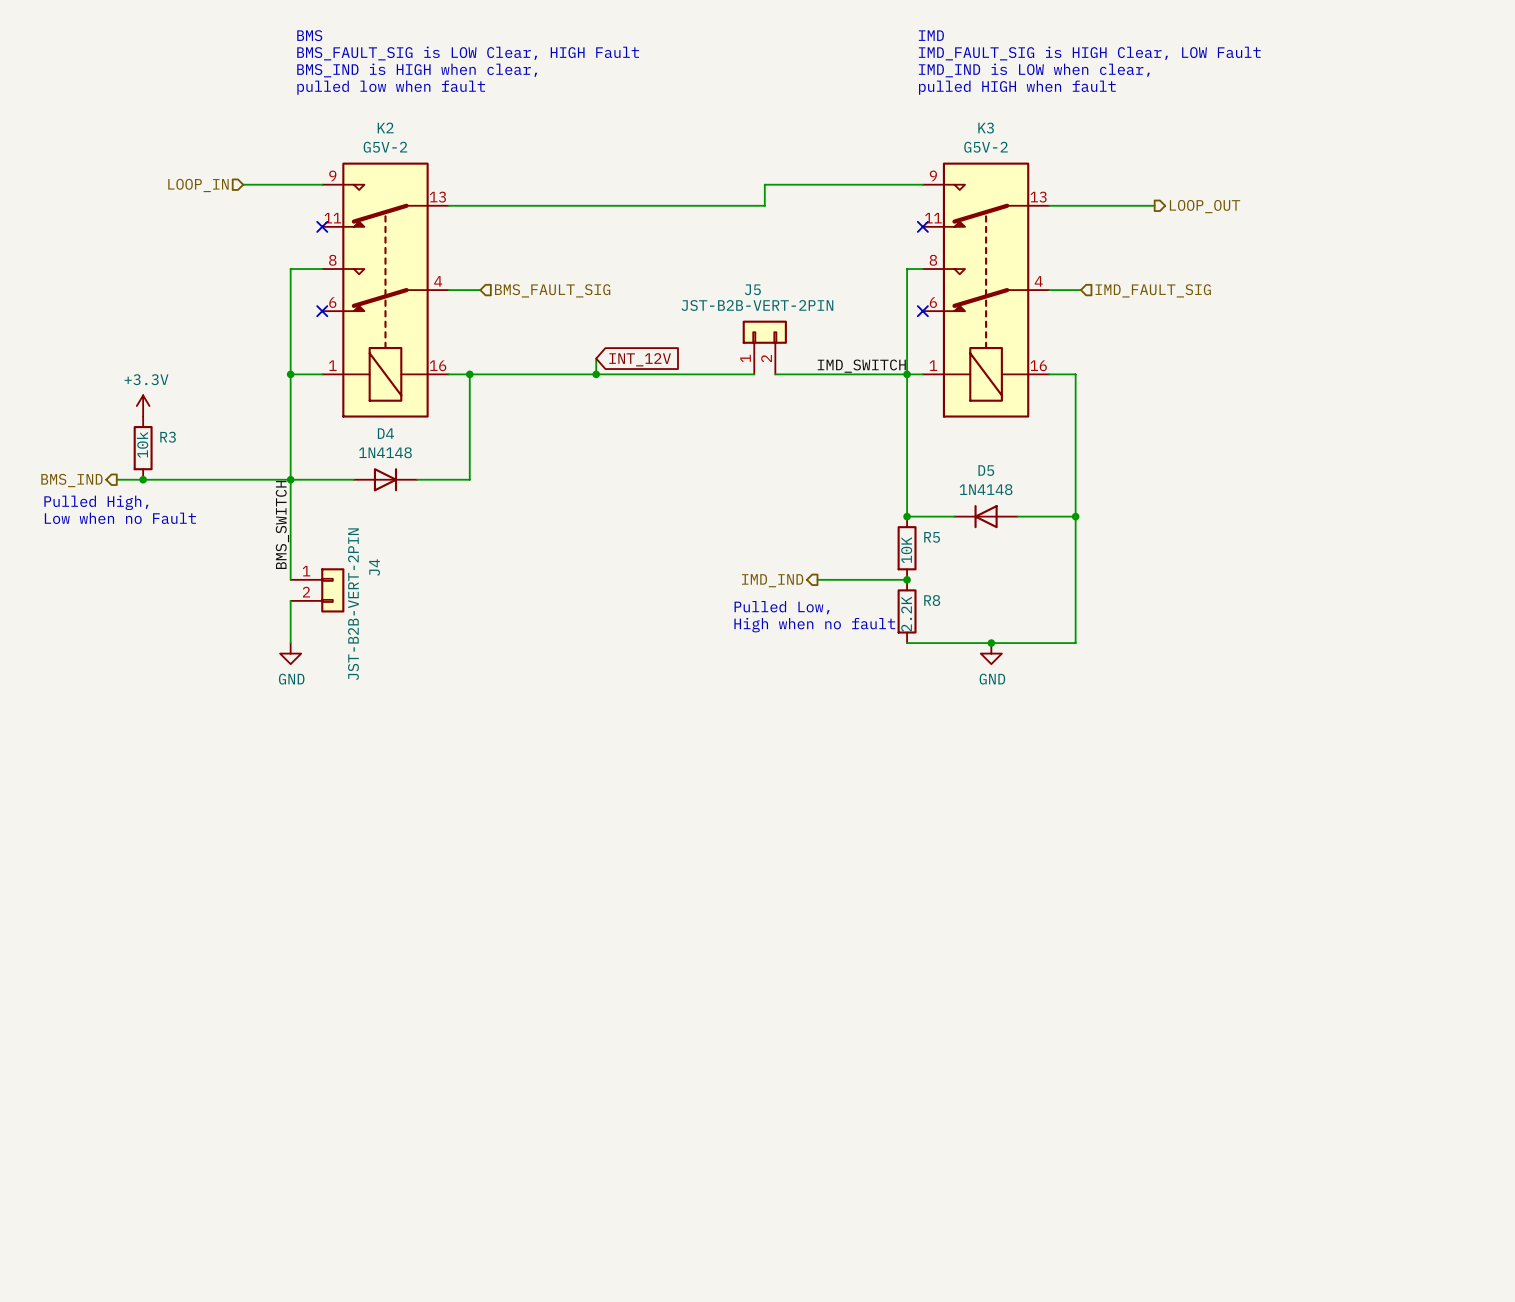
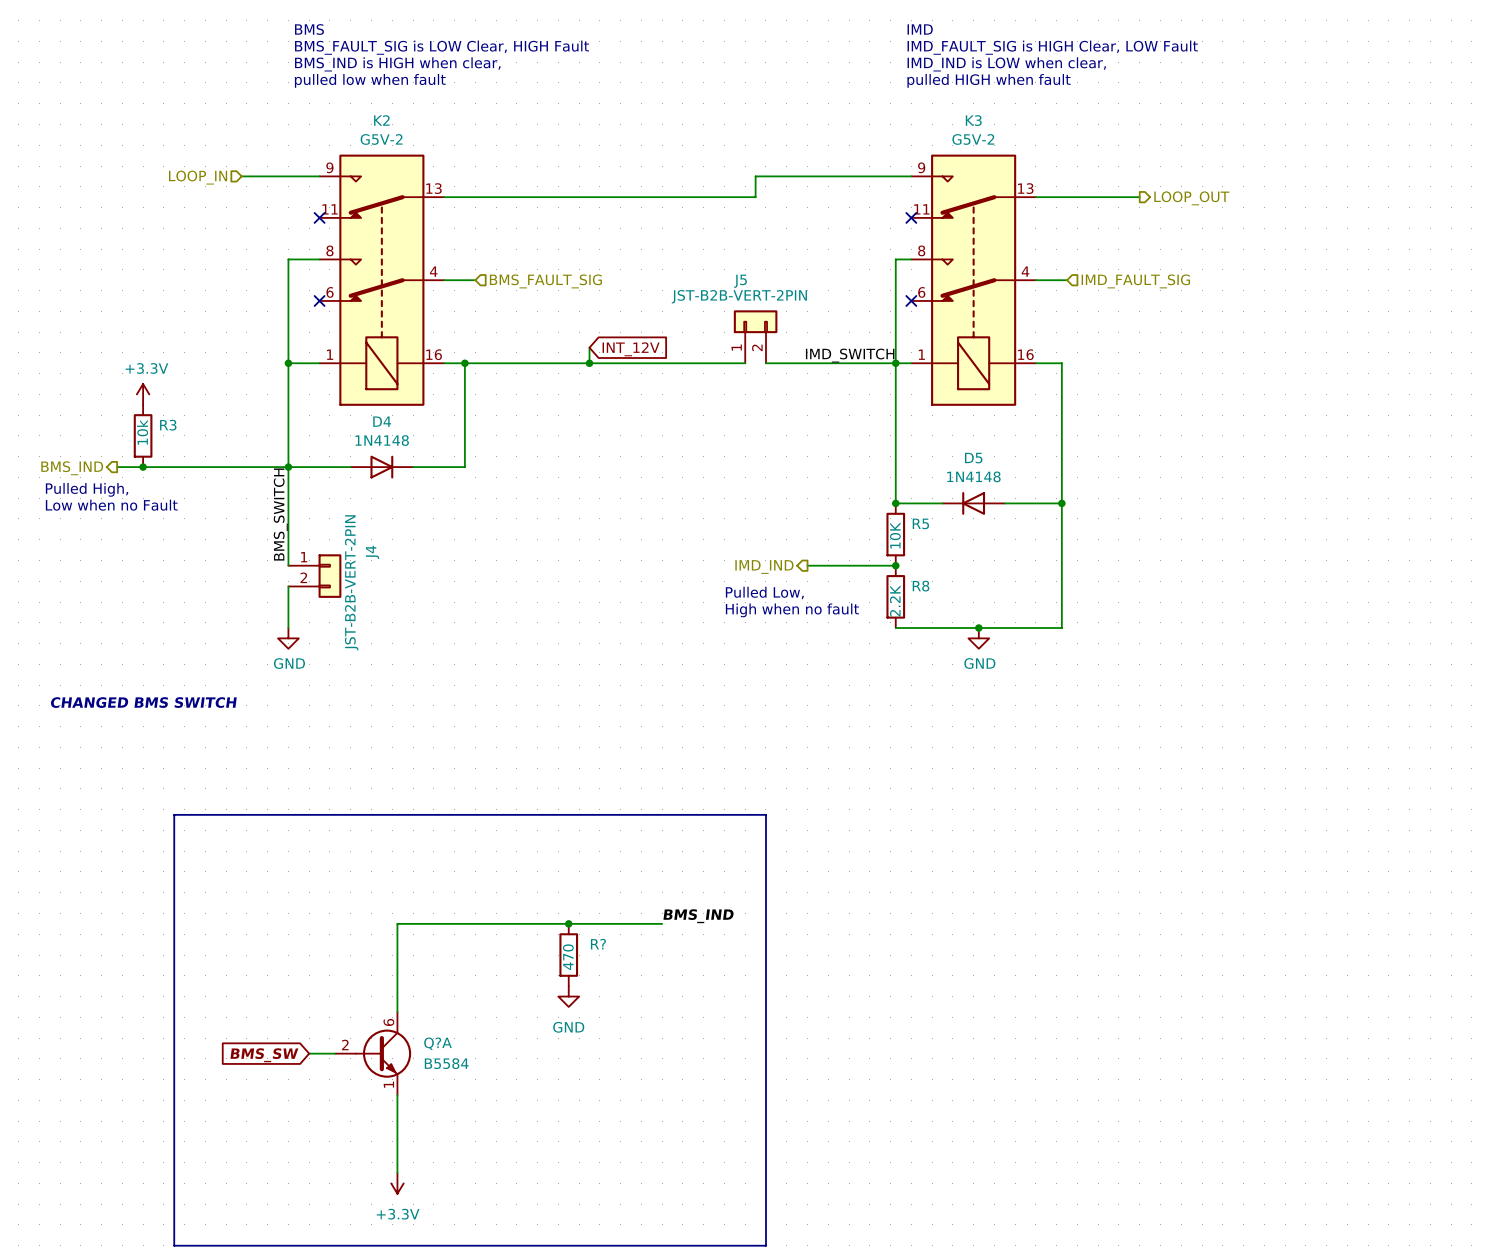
text: none -> CHANGED BMS SWITCH (143, 702)
bus: none -> (174, 814) (174, 1245) (765, 1245) (765, 814) (174, 814)
label: none -> BMS_IND (698, 916)
junction: none -> (568, 923)
wire: none -> (662, 923) (397, 923) (397, 1012)
R?: none -> 470 (568, 955)
power symbol: none -> GND (568, 996)
wire: none -> (309, 1053) (335, 1053)
Q?A: none -> B5584 (373, 1053)
global label: none -> BMS_SW (264, 1055)
wire: none -> (397, 1095) (397, 1173)
power symbol: none -> +3.3V (397, 1183)

